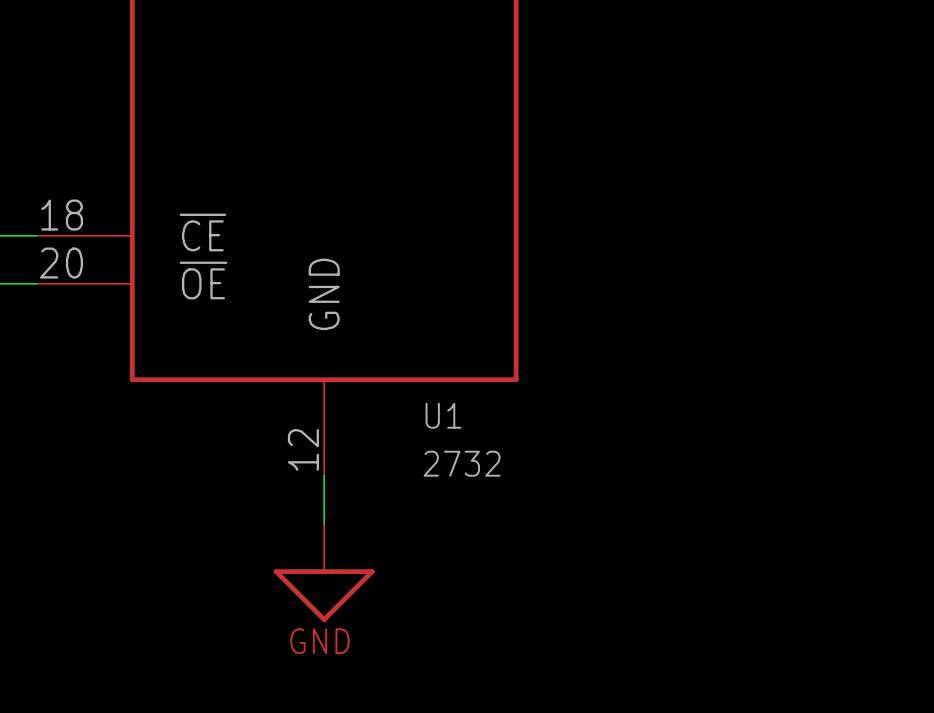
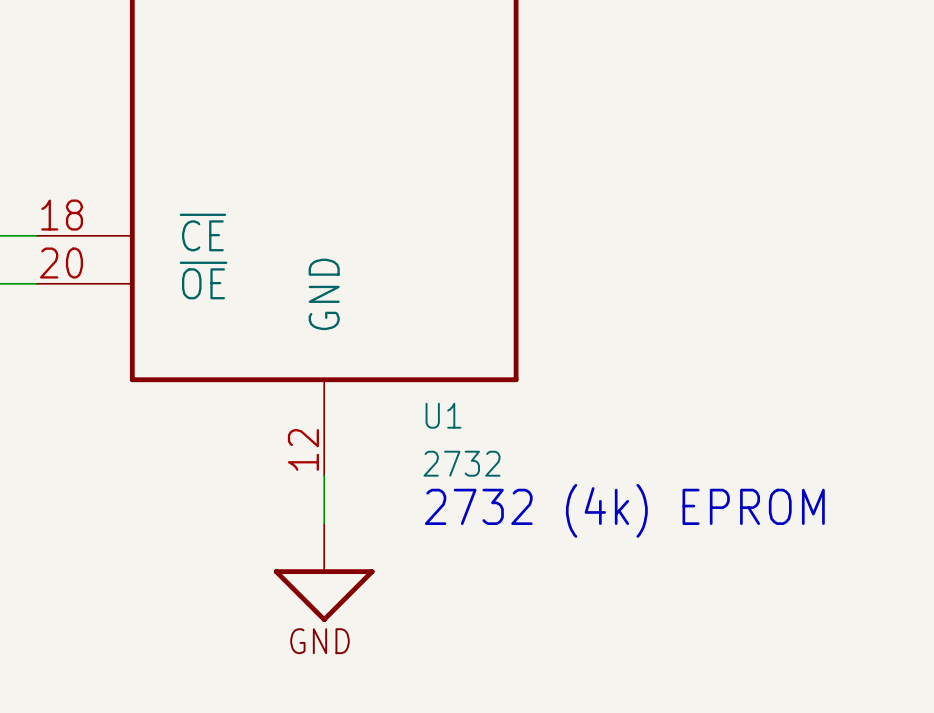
text: none -> 2732 (4k) EPROM (624, 510)

